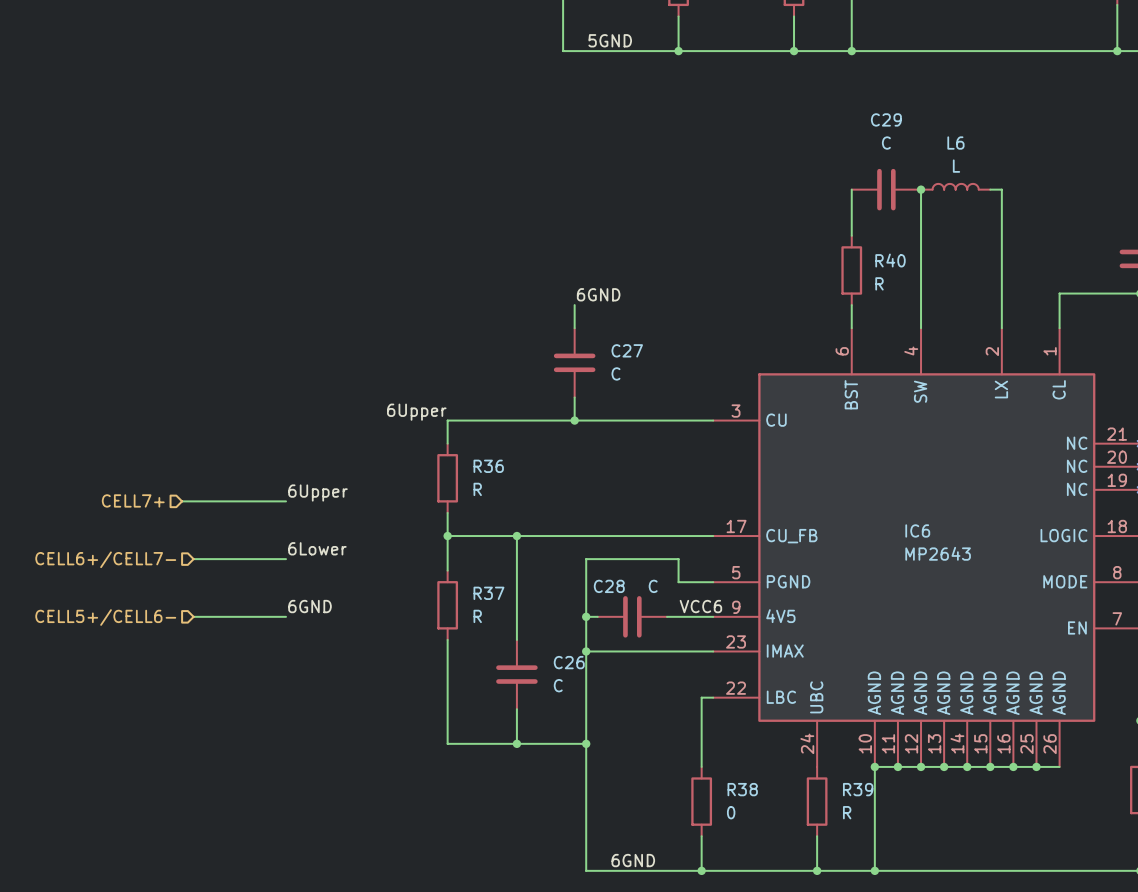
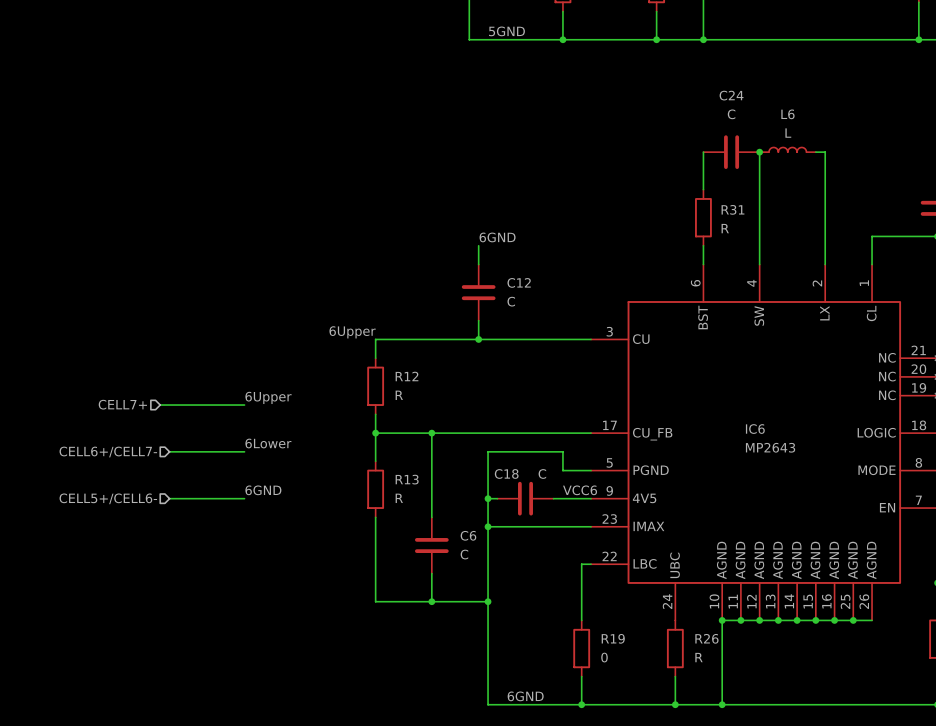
C29 name: C29 (886, 119) -> C24 (731, 95)
R40 name: R40 (890, 260) -> R31 (732, 209)
C27 name: C27 (627, 350) -> C12 (519, 282)
R36 name: R36 (488, 466) -> R12 (407, 376)
C28 name: C28 (609, 586) -> C18 (506, 473)
R37 name: R37 (488, 593) -> R13 (407, 479)
C26 name: C26 (569, 662) -> C6 (468, 535)
R38 name: R38 (742, 789) -> R19 (613, 638)
R39 name: R39 (858, 789) -> R26 (706, 638)

